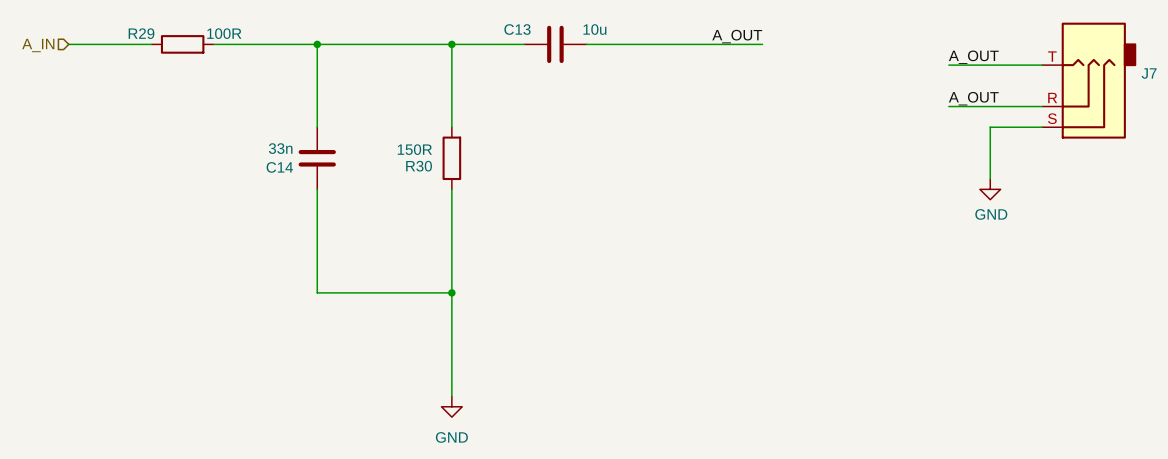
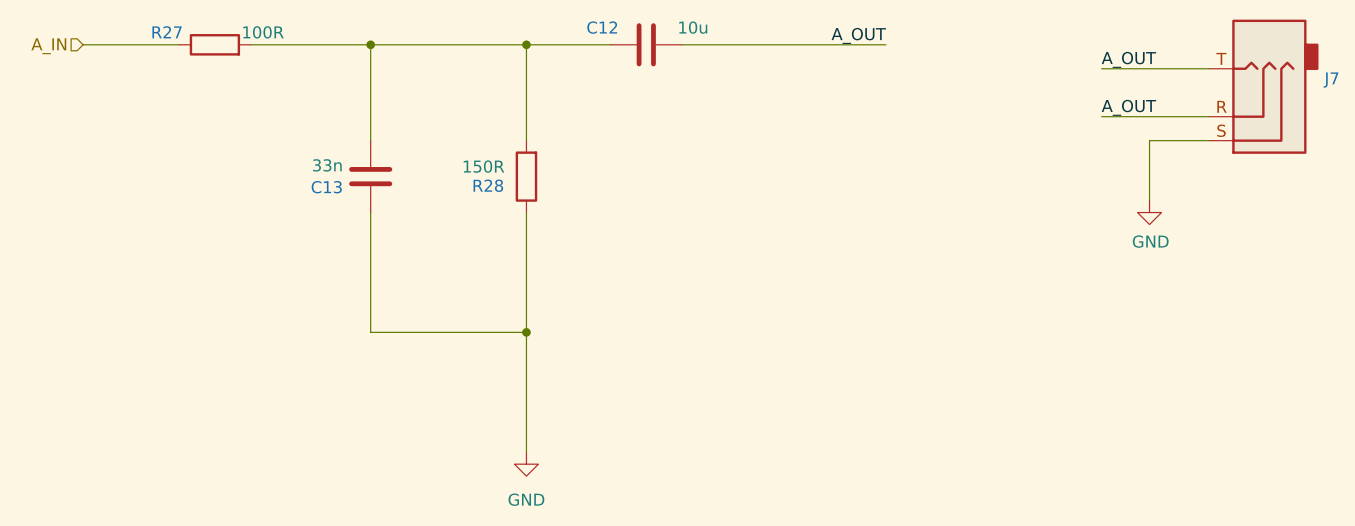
C13 name: C13 (517, 29) -> C12 (602, 27)
R29 name: R29 (141, 33) -> R27 (167, 32)
R30 name: R30 (419, 166) -> R28 (488, 185)
C14 name: C14 (279, 167) -> C13 (326, 187)

